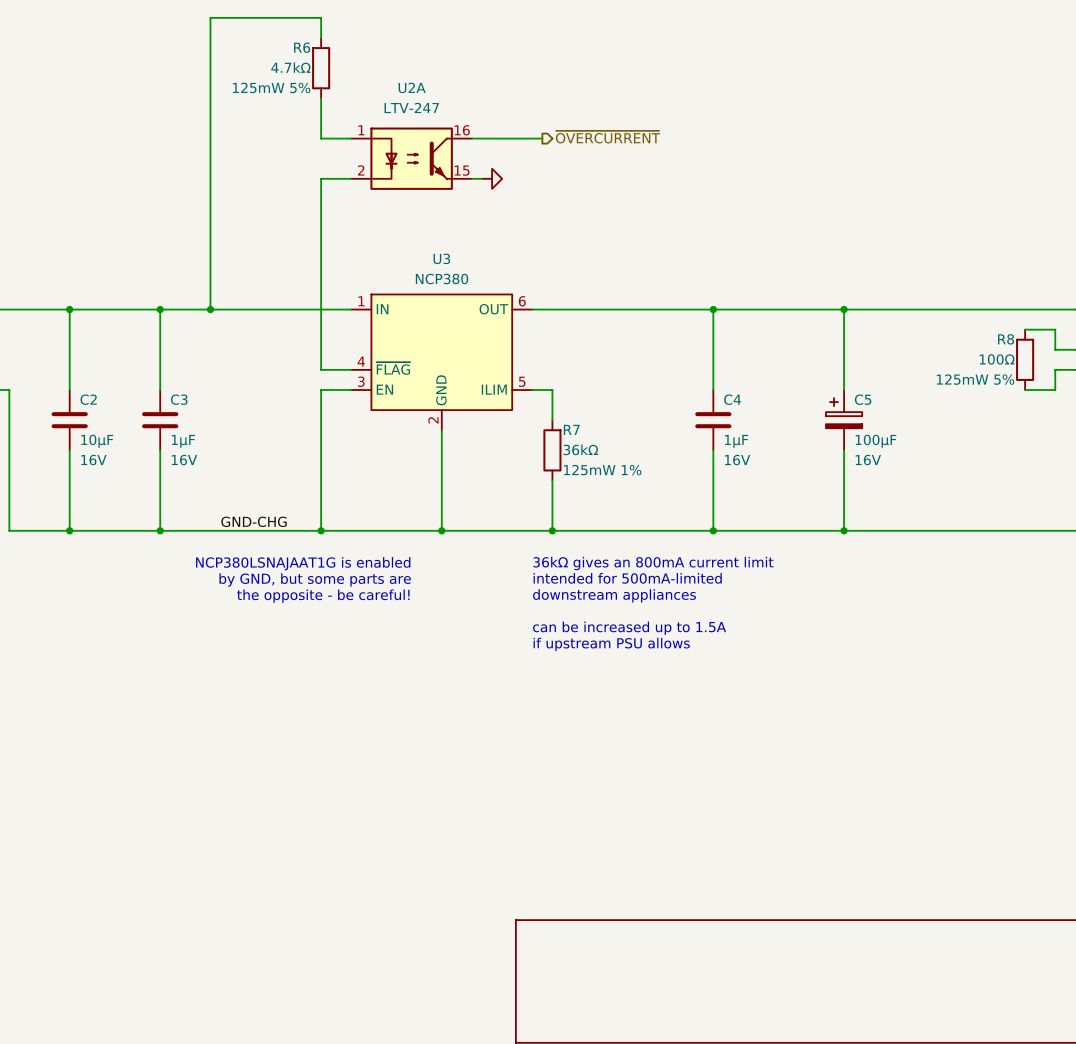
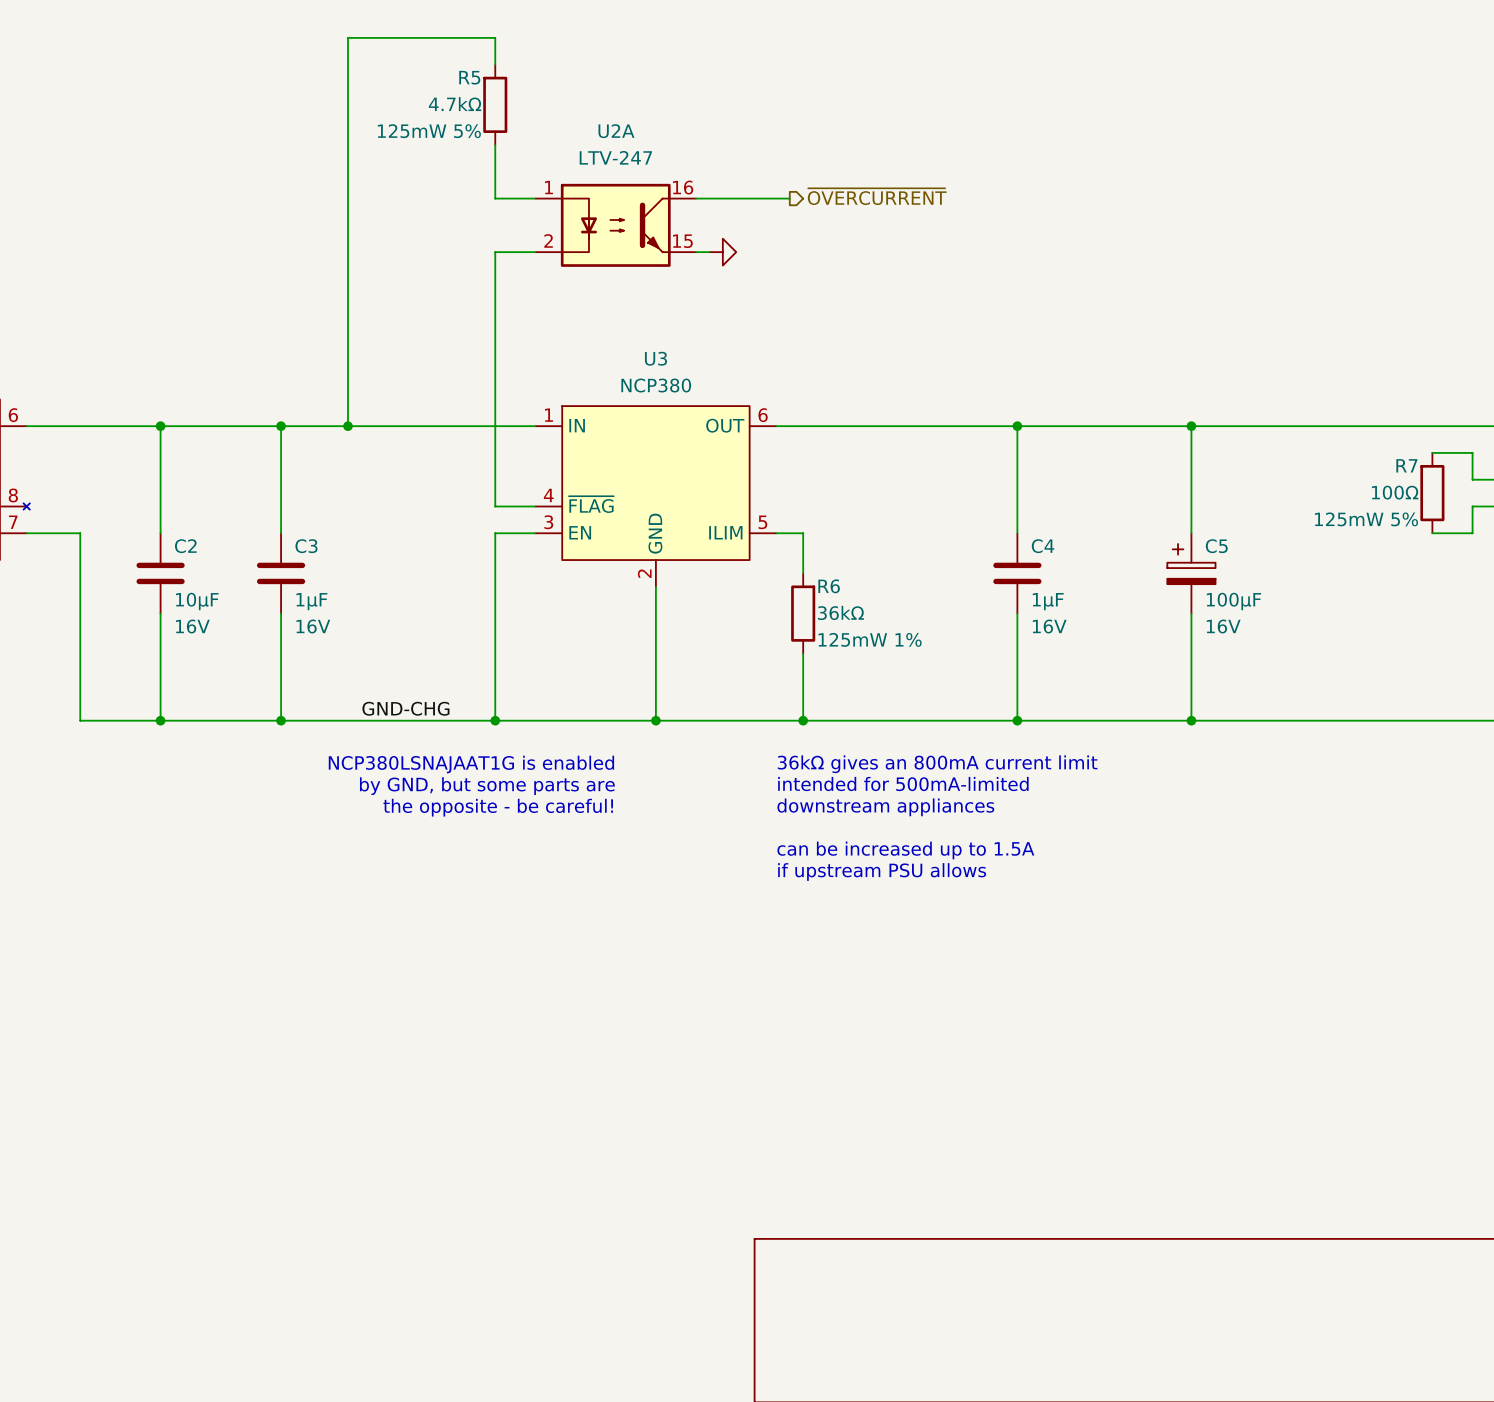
R6 name: R6 (302, 47) -> R5 (469, 77)
R8 name: R8 (1006, 339) -> R7 (1406, 465)
R7 name: R7 (571, 429) -> R6 (829, 586)

